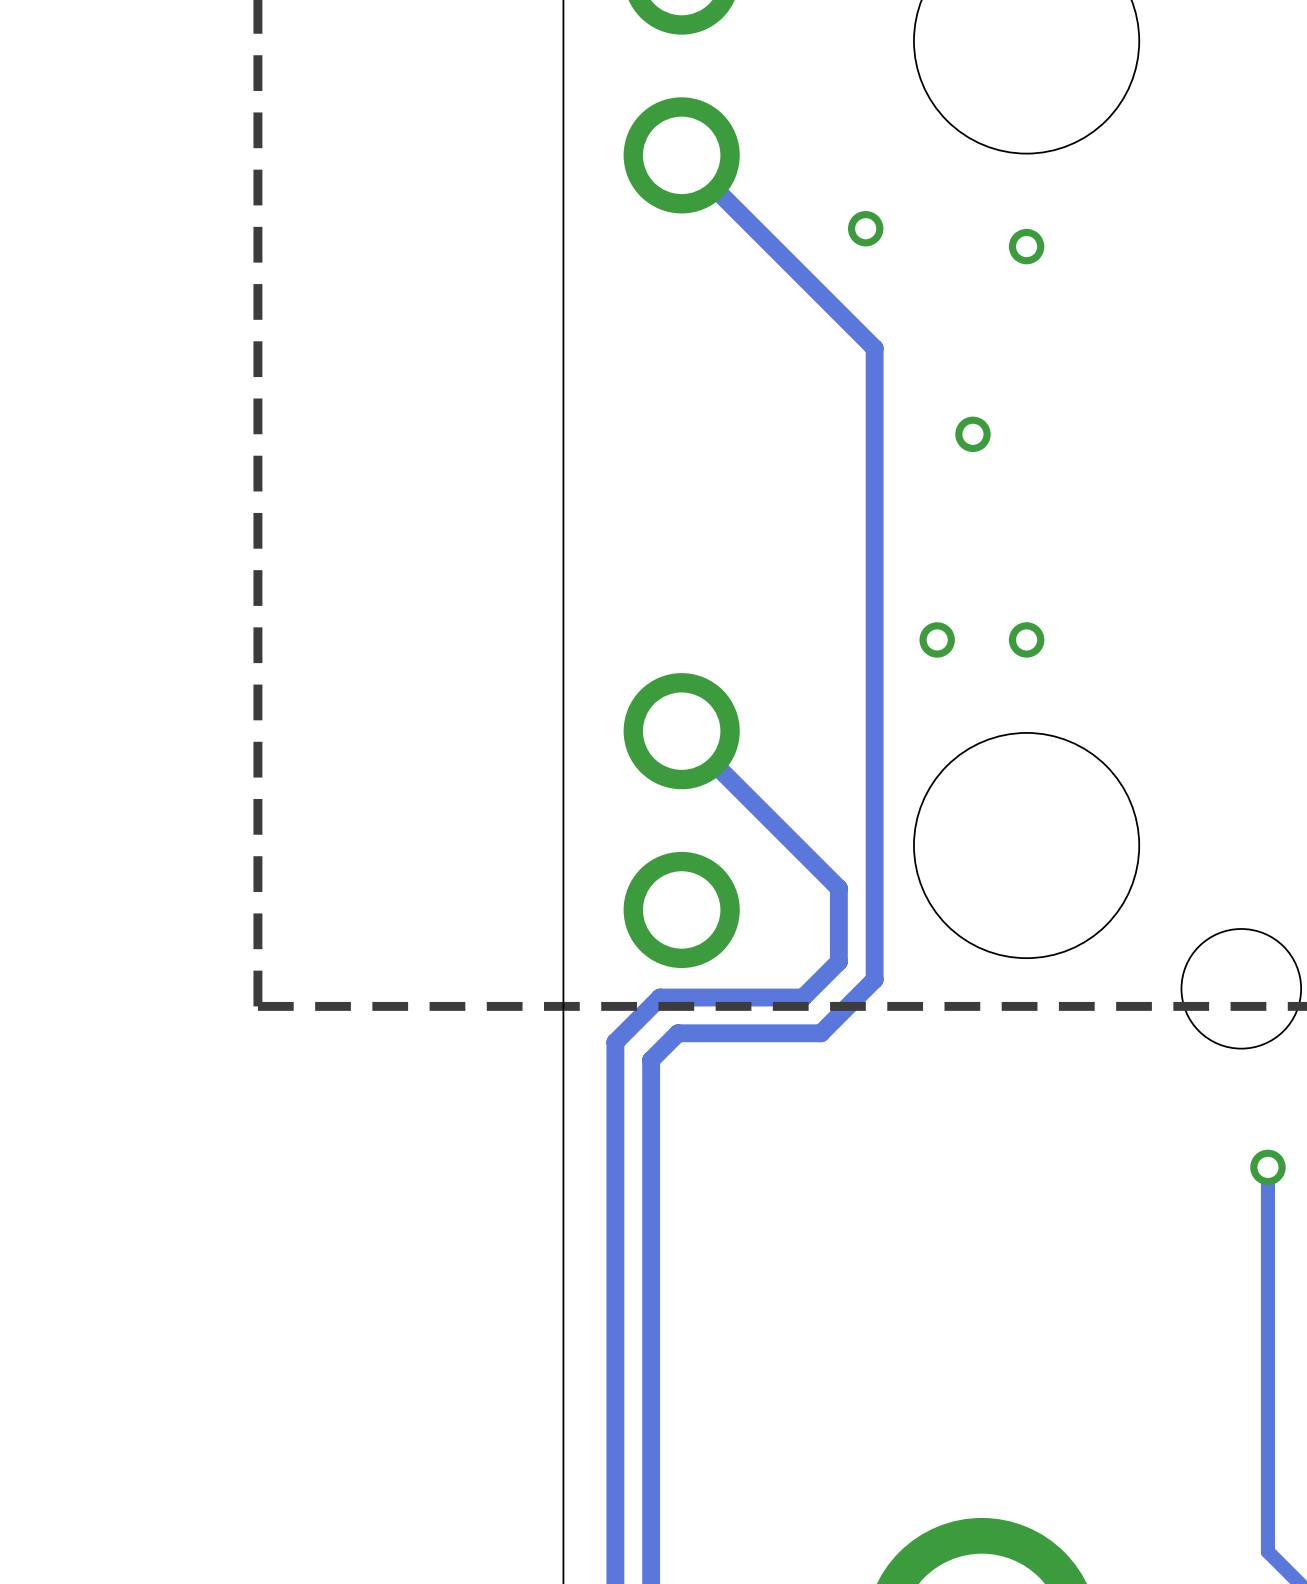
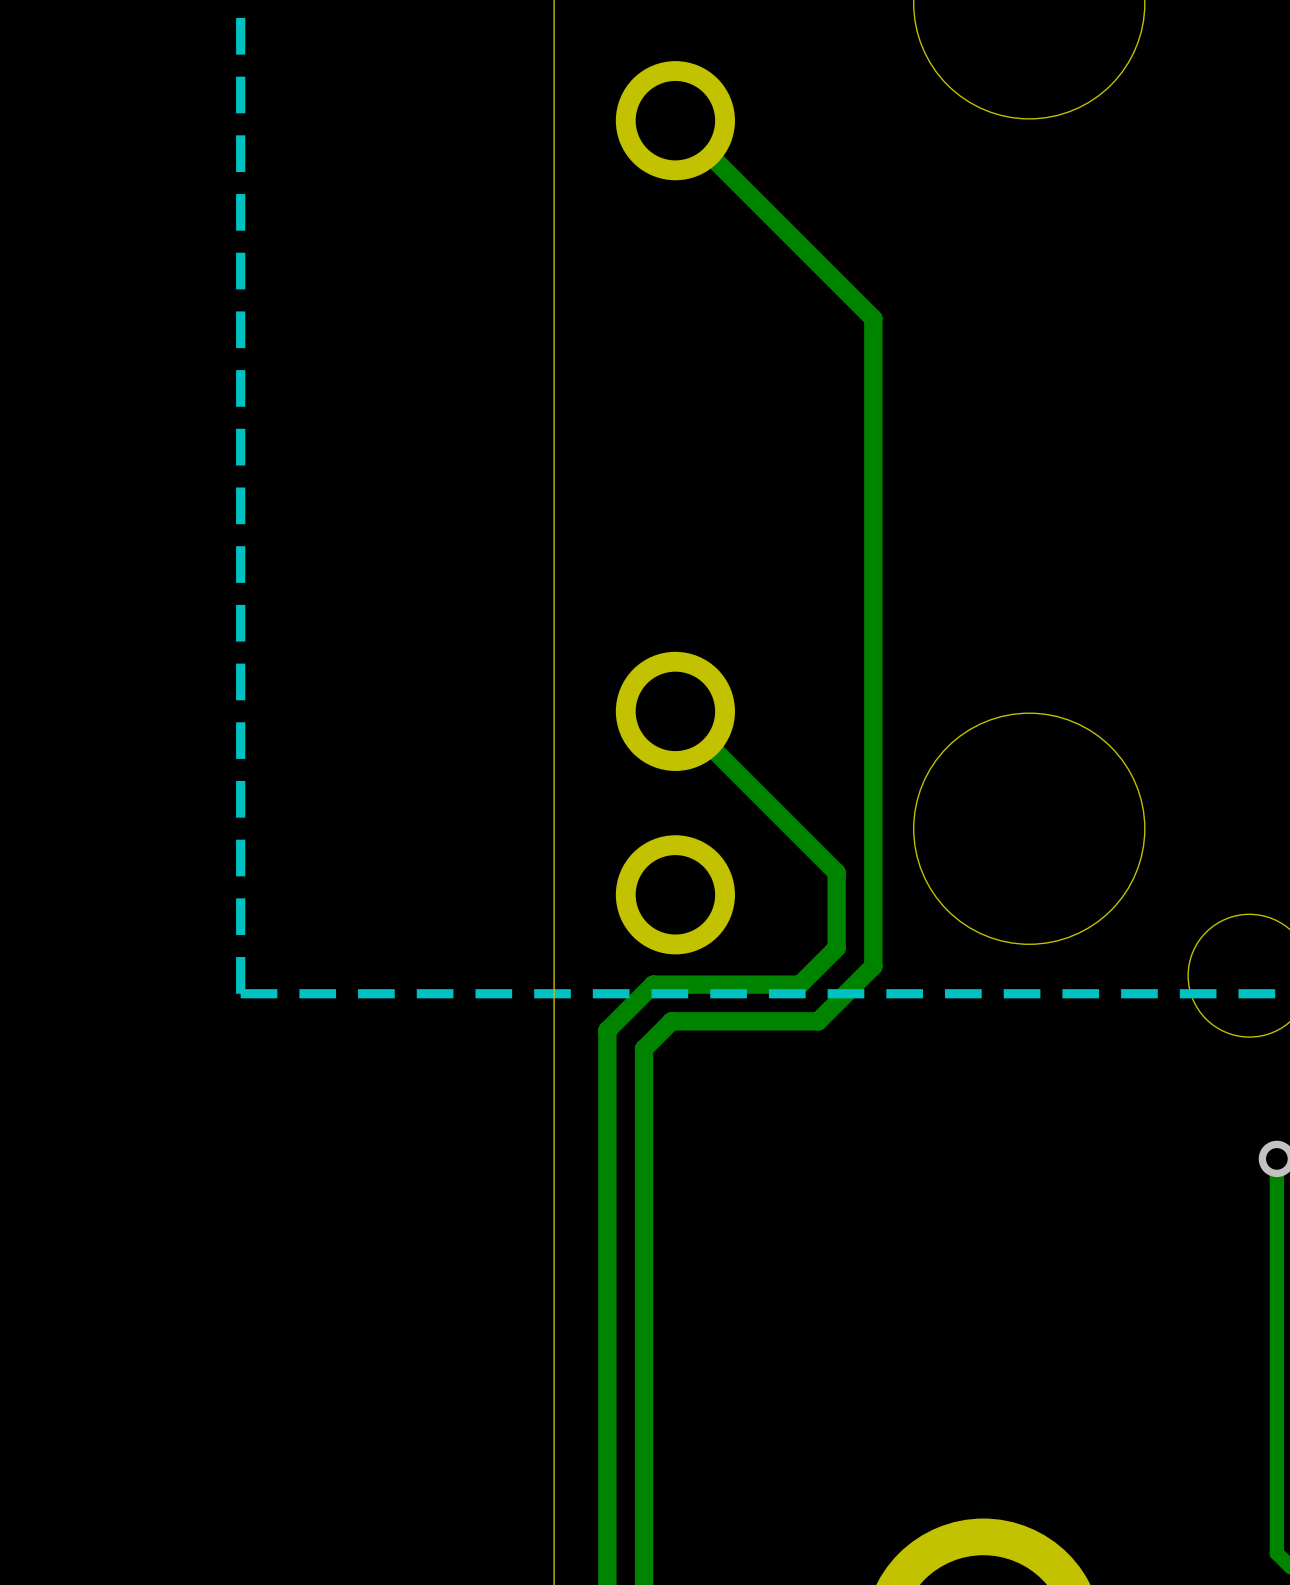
via: (865, 228) -> none
via: (1026, 246) -> none
via: (972, 434) -> none
via: (937, 639) -> none
via: (1026, 639) -> none

